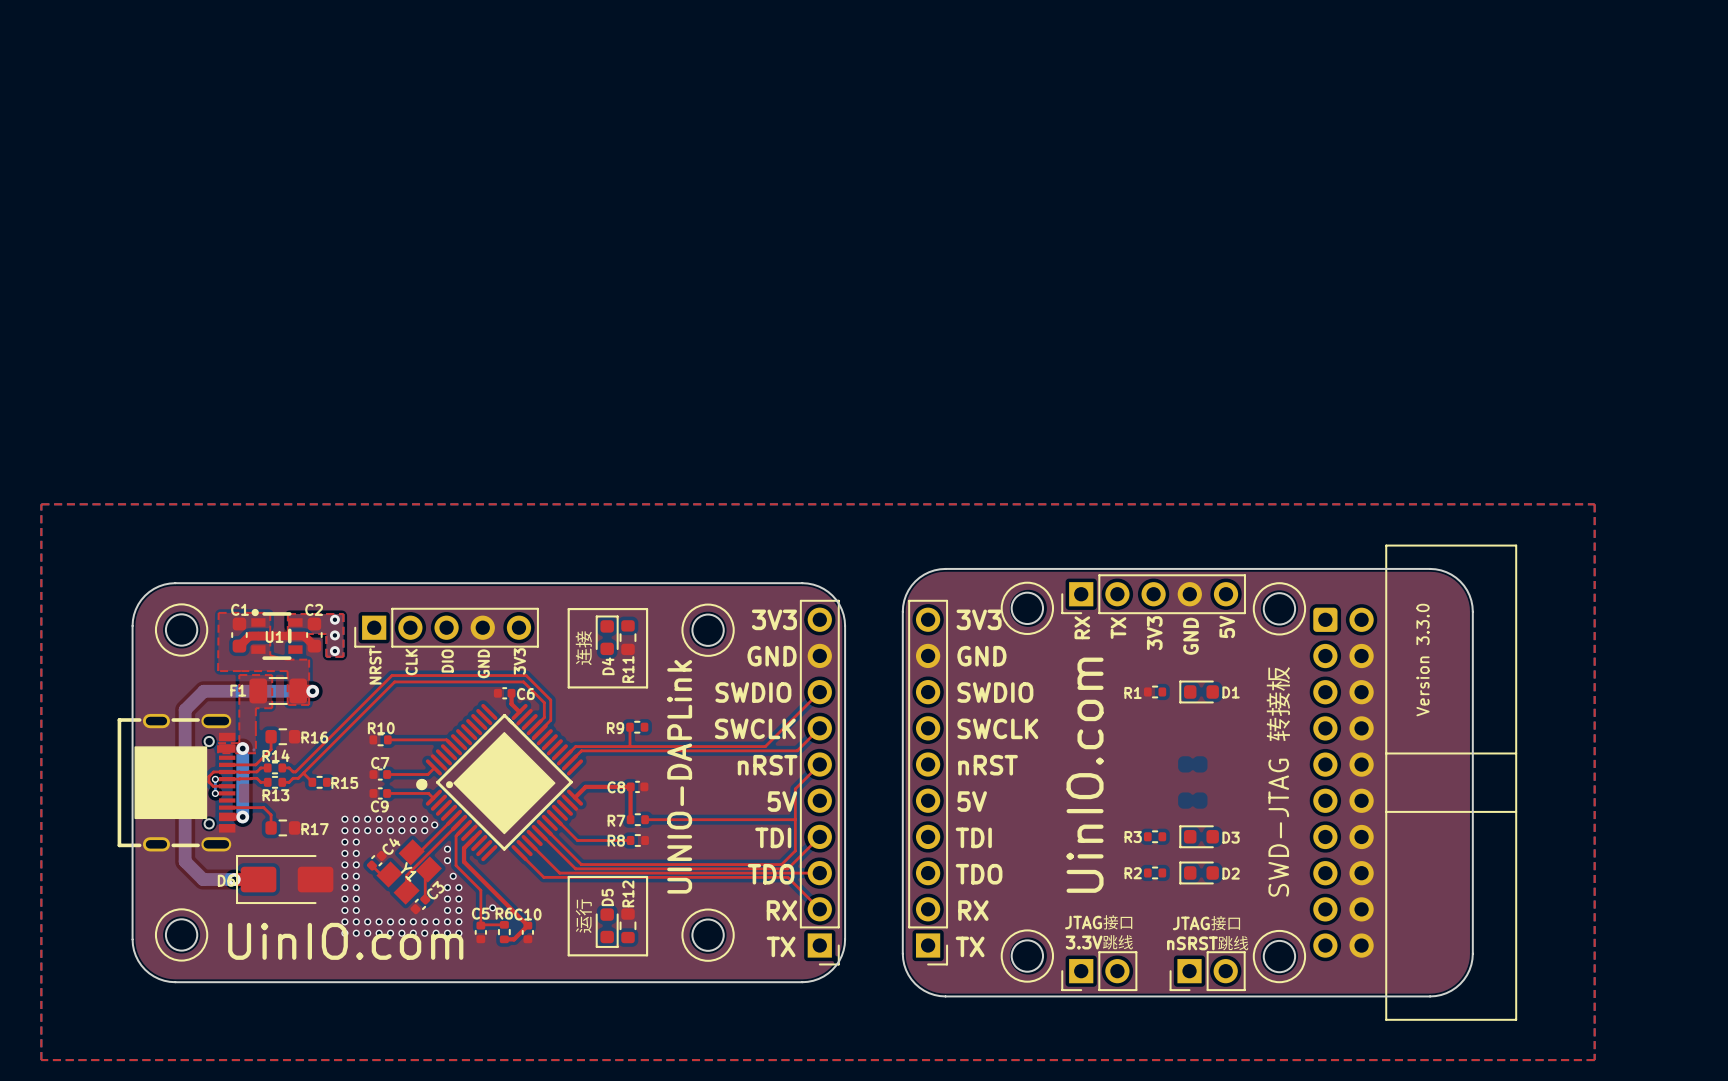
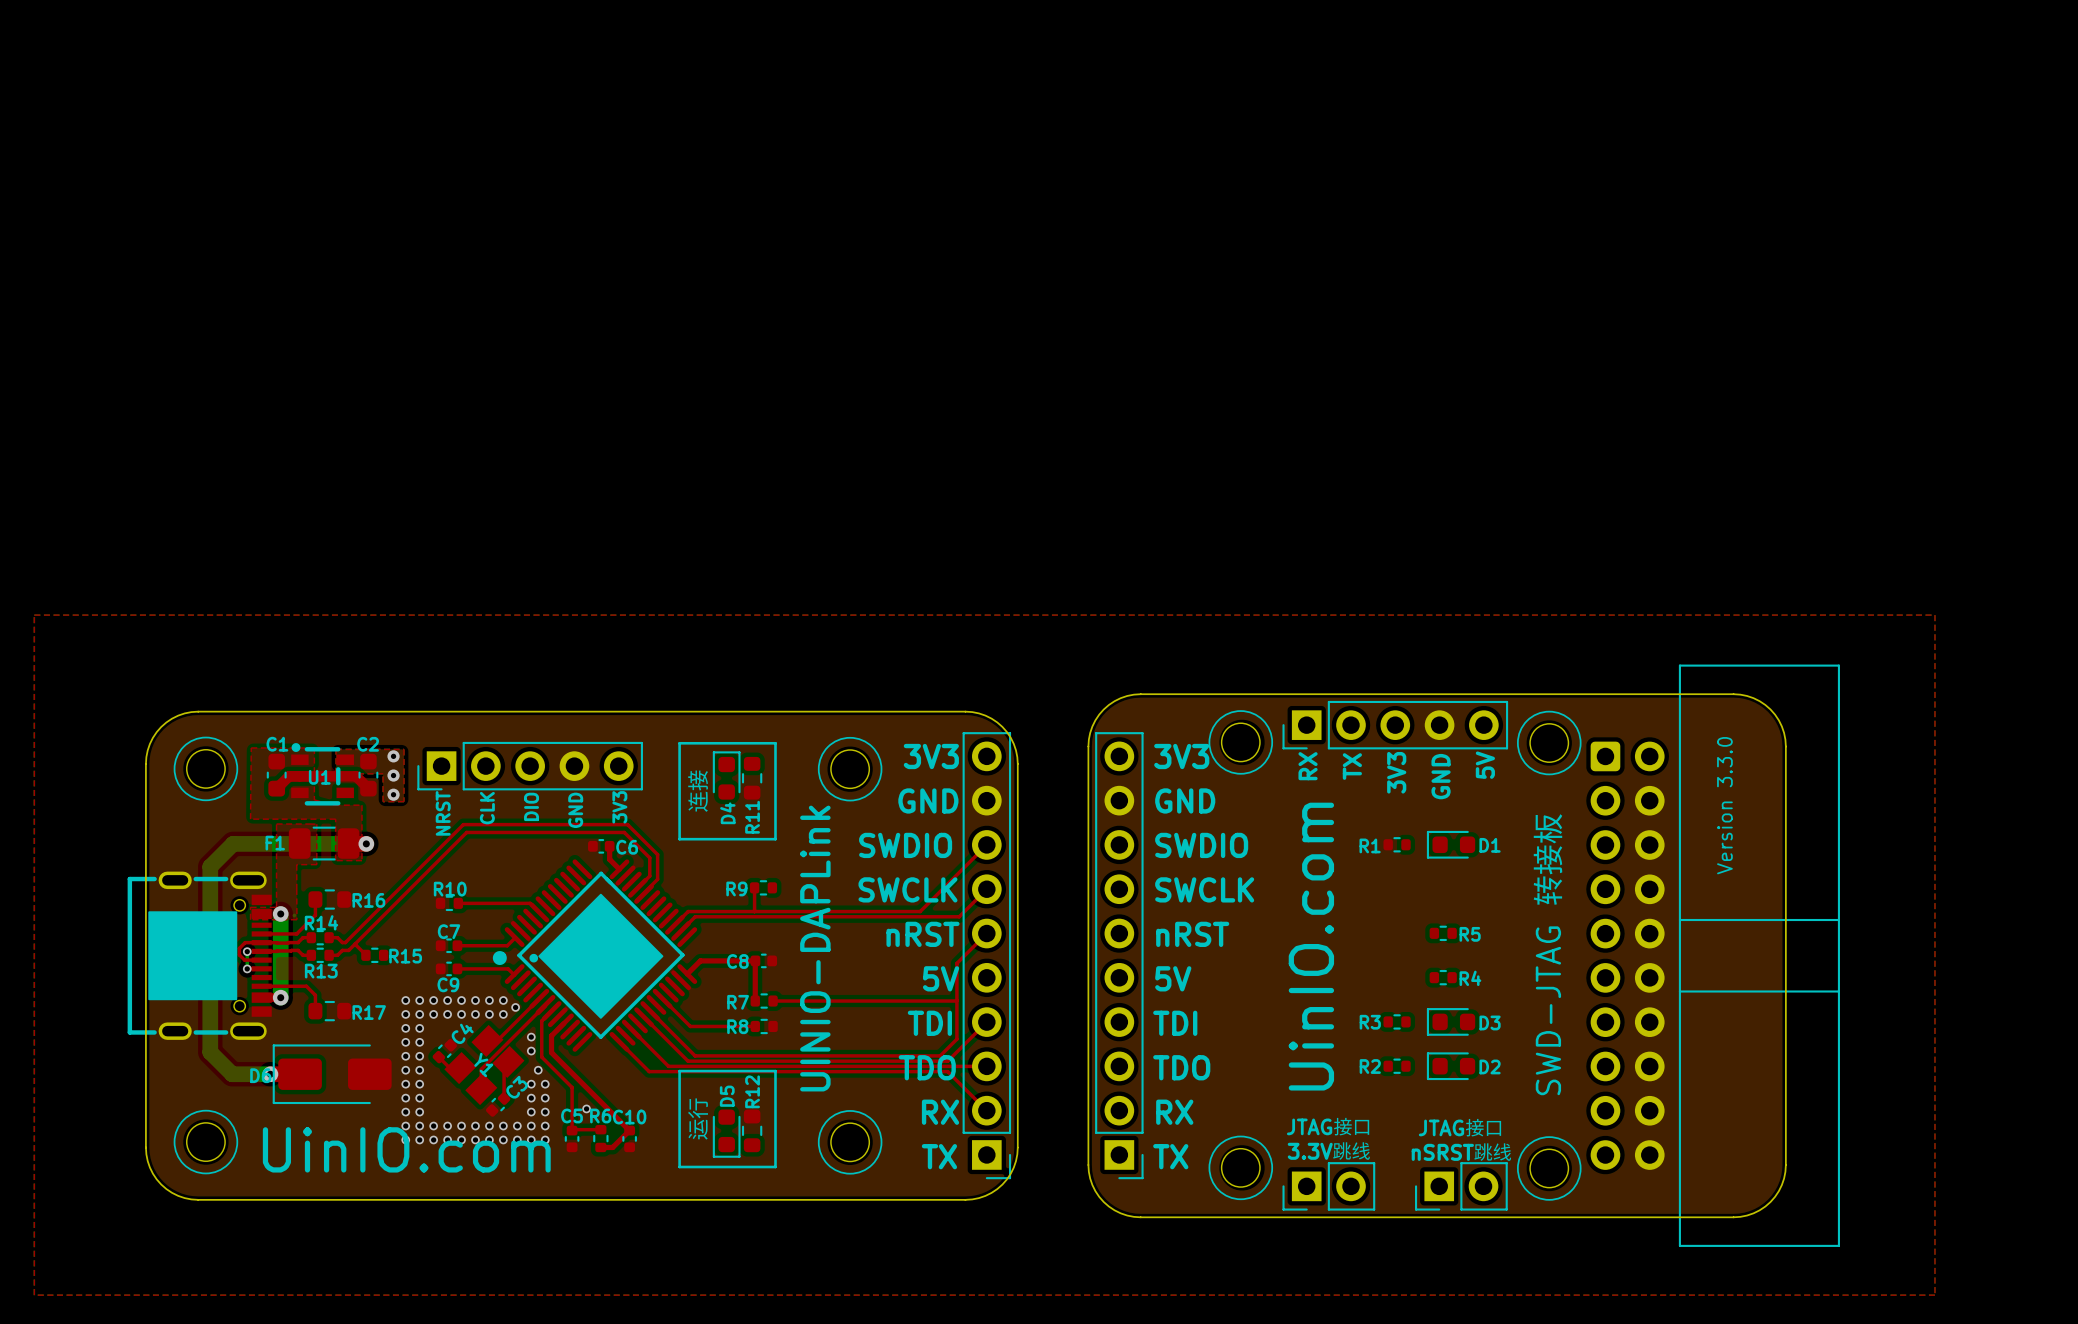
R5: none -> (1443, 933)
R4: none -> (1443, 977)

